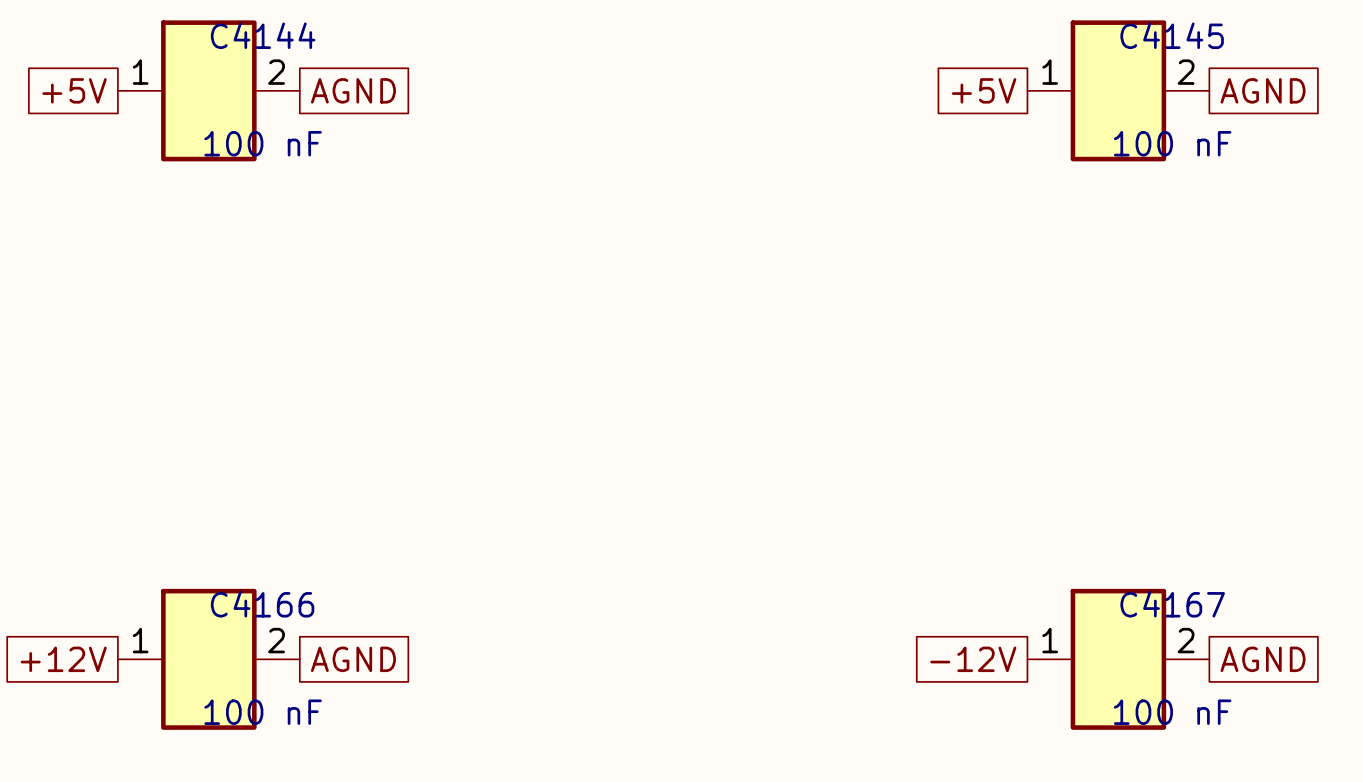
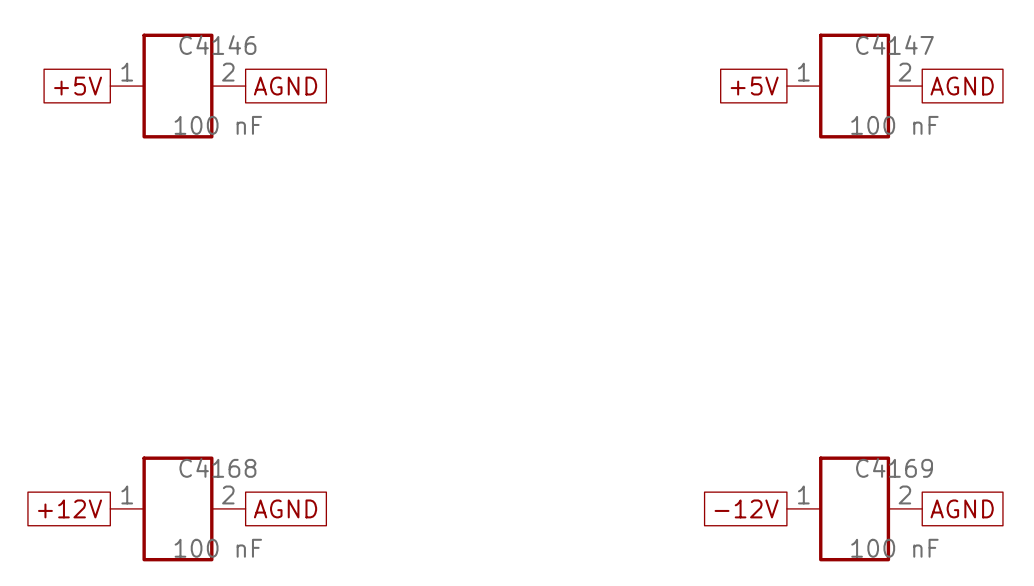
C4144 name: C4144 (263, 35) -> C4146 (217, 45)
C4145 name: C4145 (1172, 35) -> C4147 (894, 45)
C4166 name: C4166 (262, 604) -> C4168 (217, 467)
C4167 name: C4167 (1172, 604) -> C4169 (894, 467)

